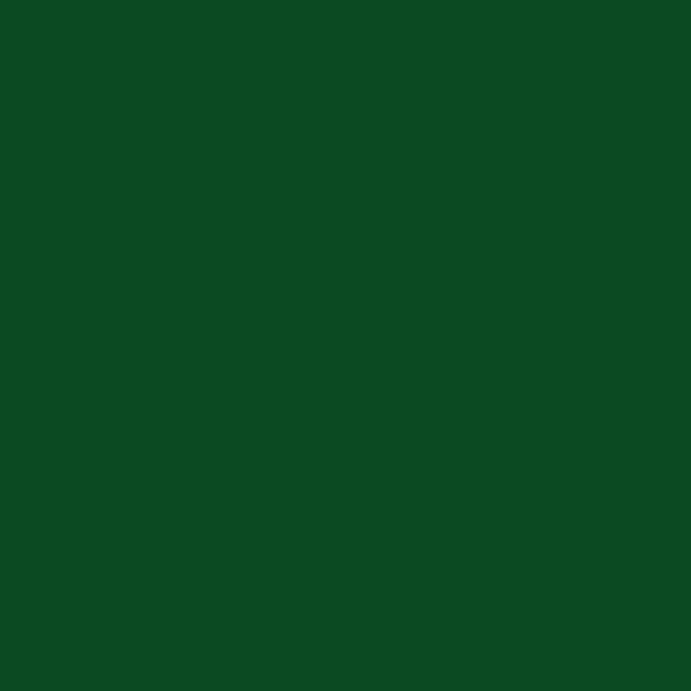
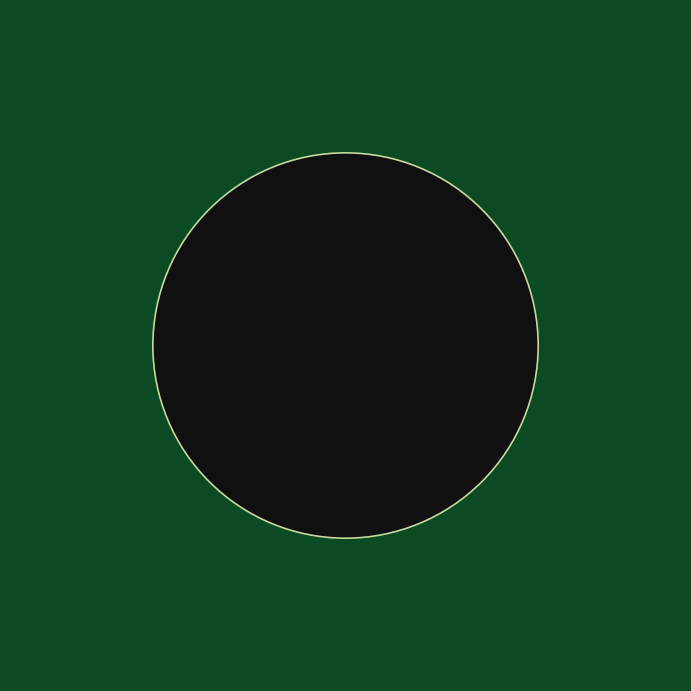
part: none -> (345, 345)

